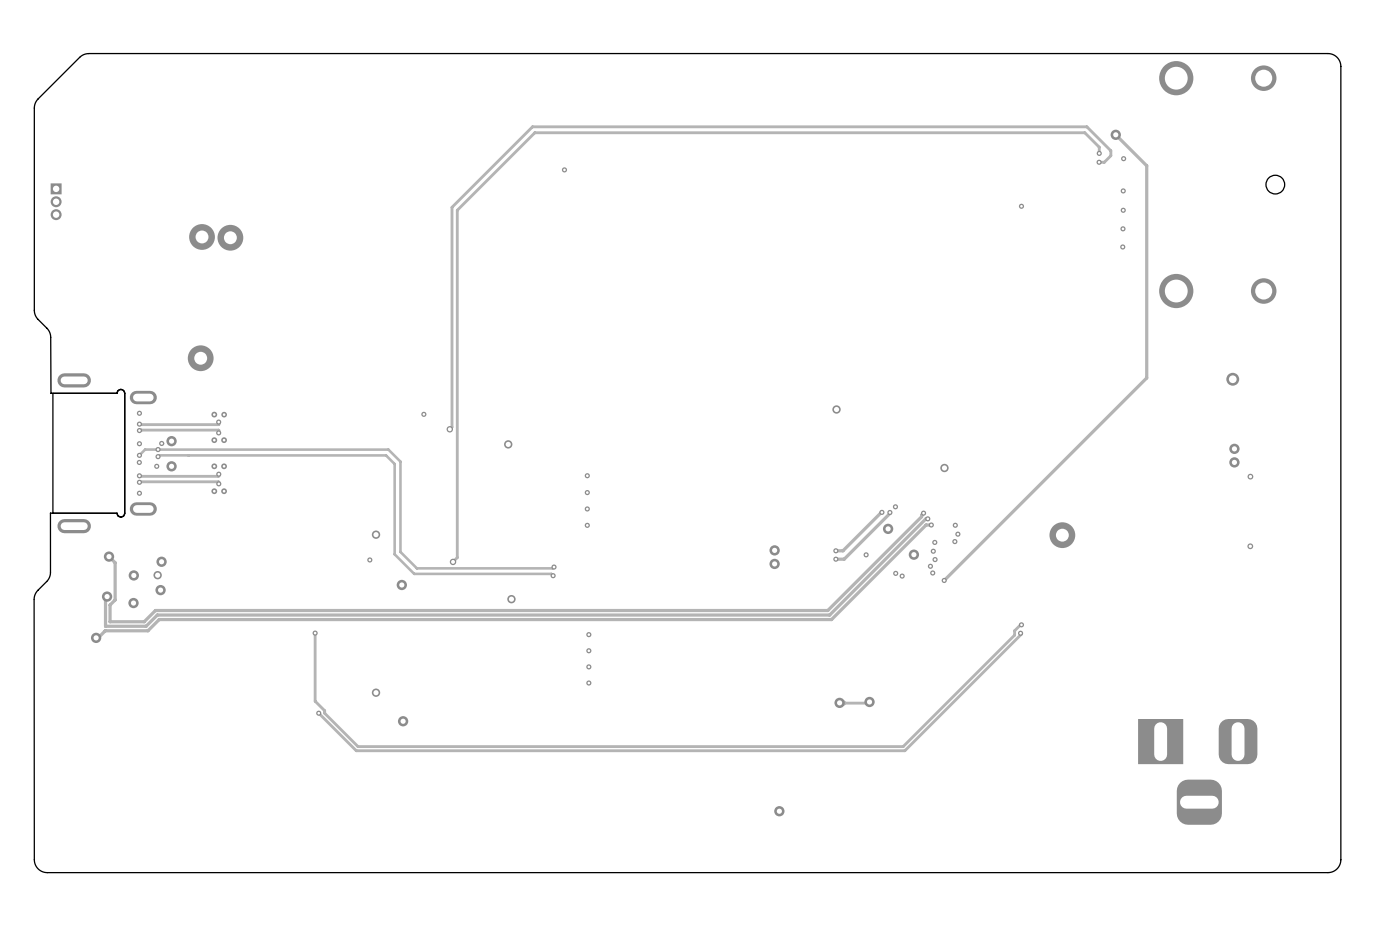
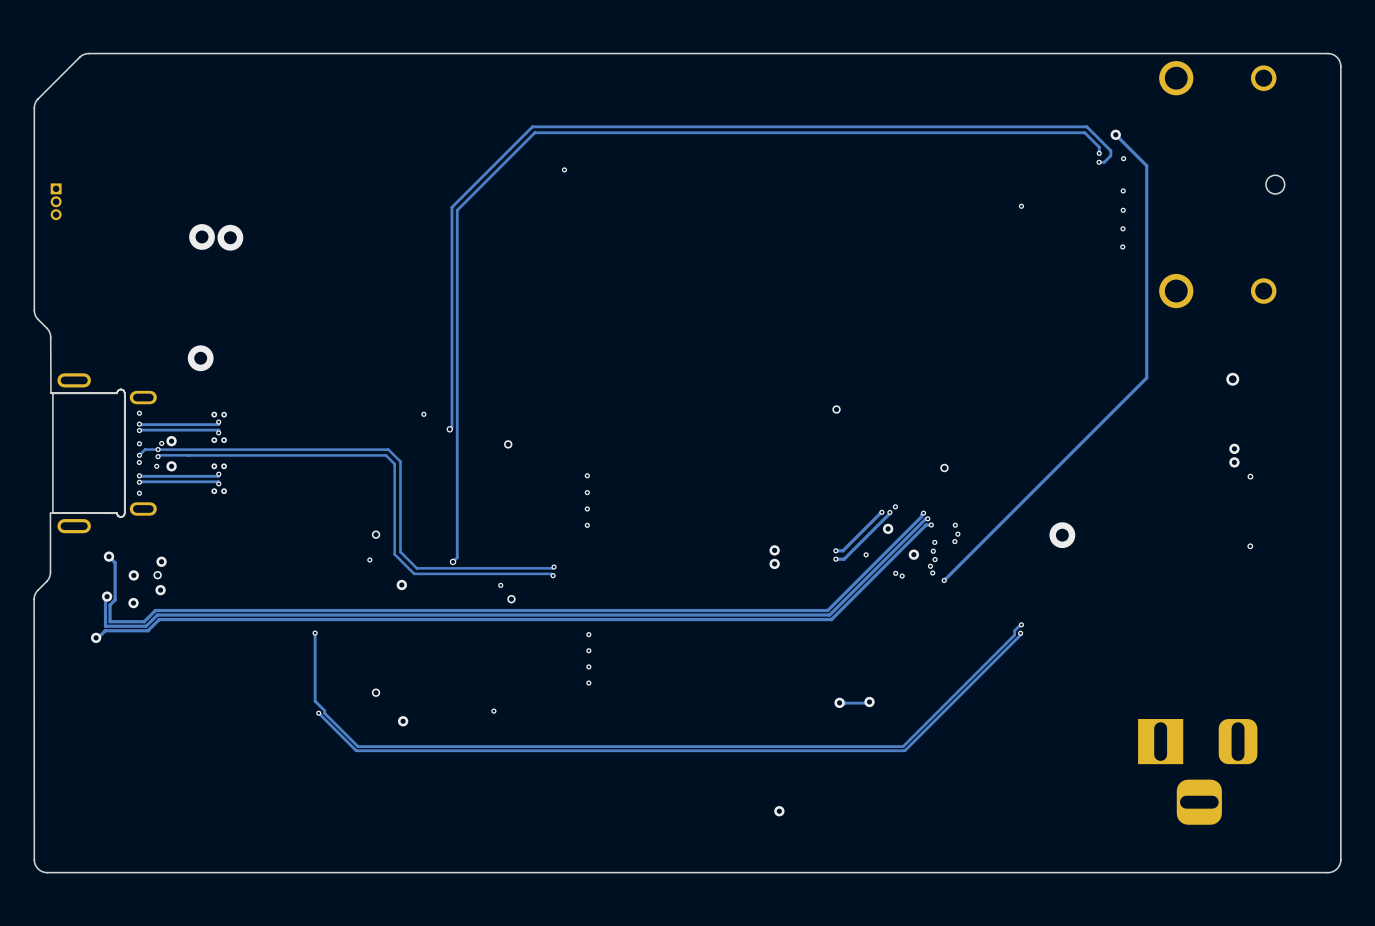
via: none -> (500, 585)
via: none -> (493, 711)

